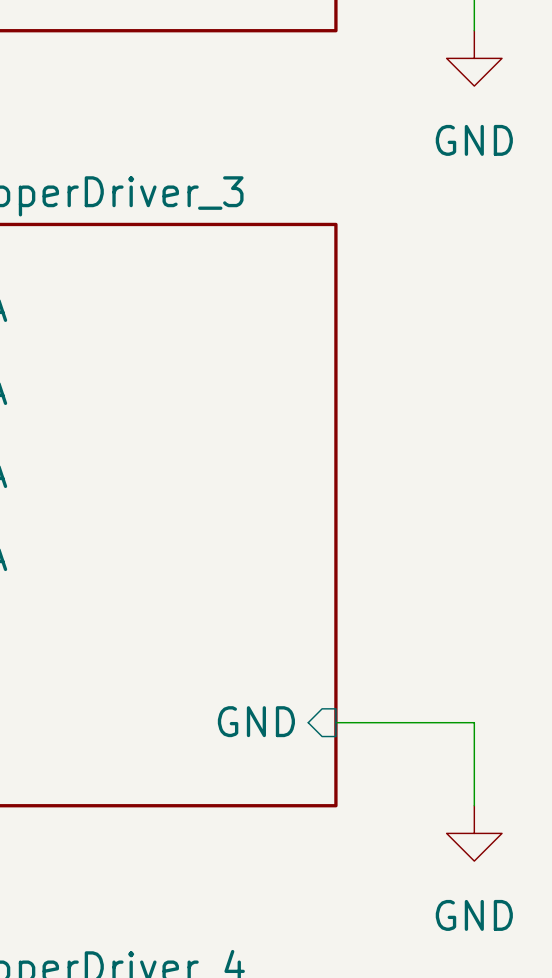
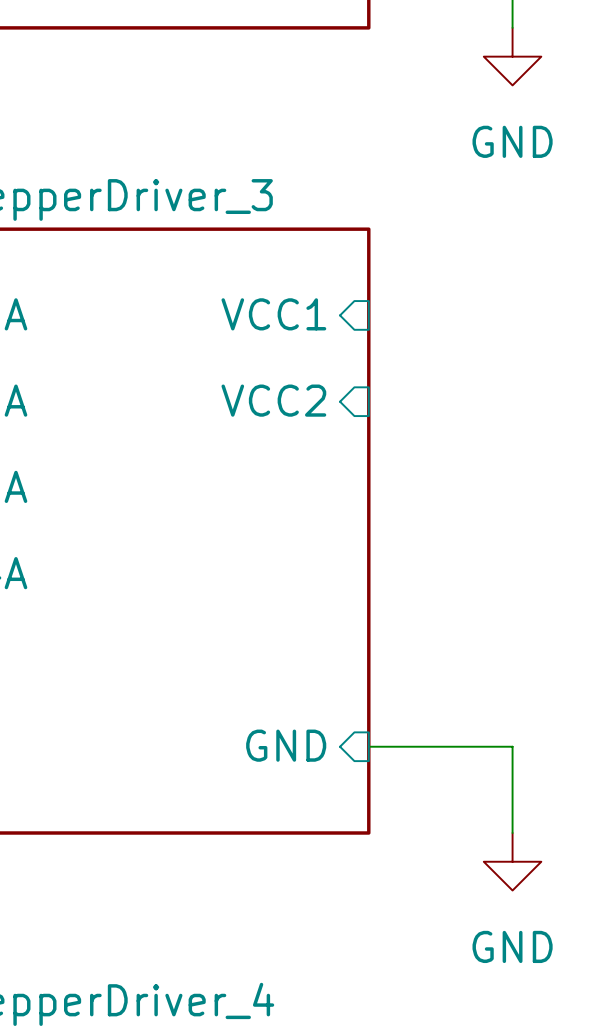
sheet pin: none -> VCC1 (273, 314)
sheet pin: none -> VCC2 (273, 400)

